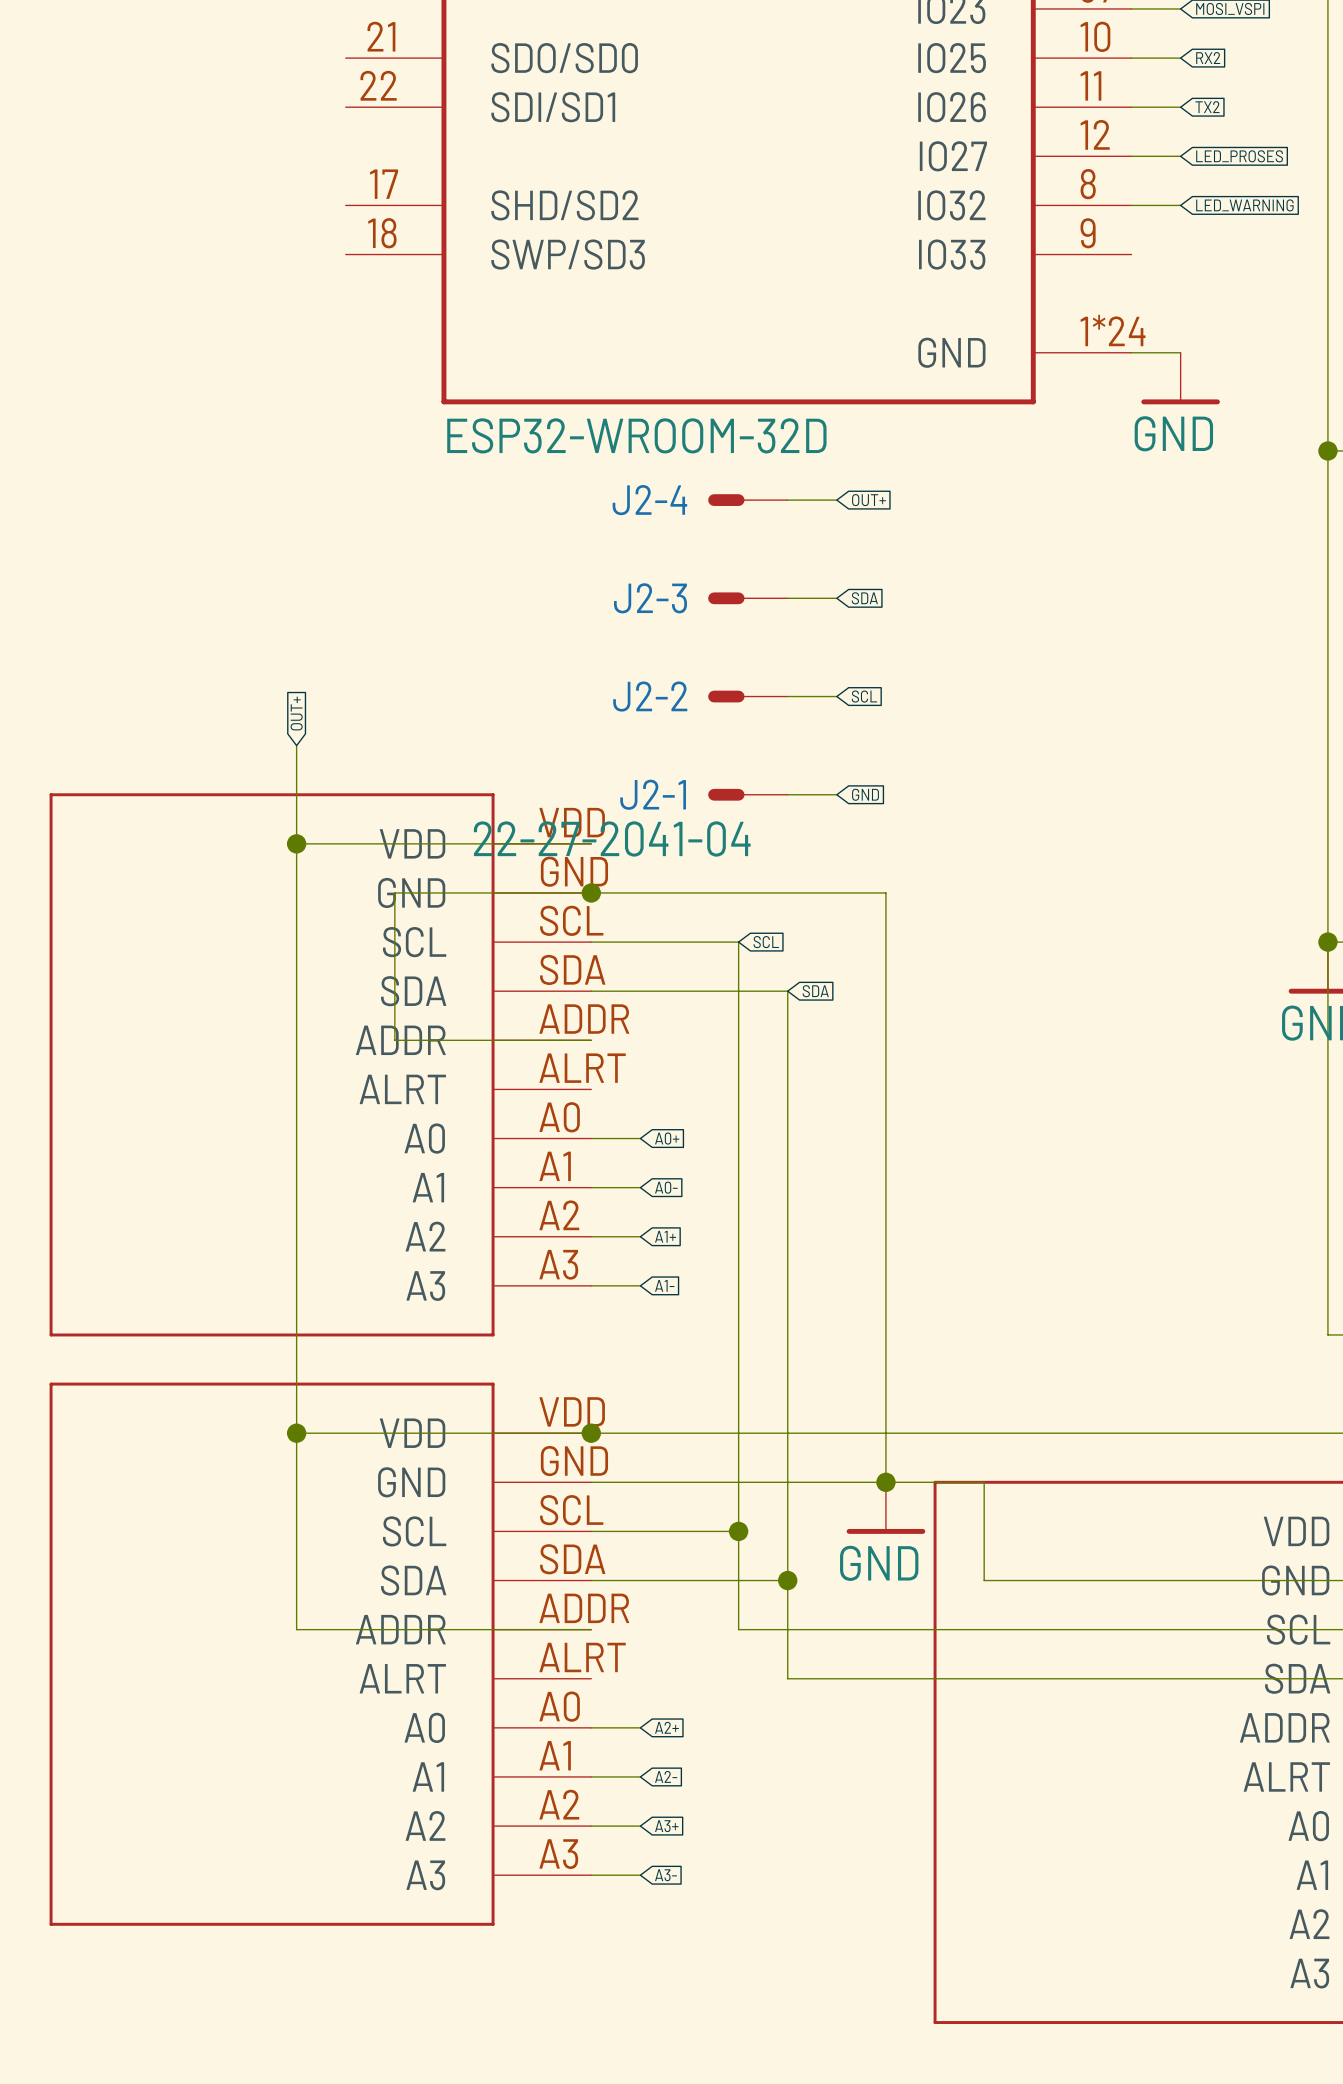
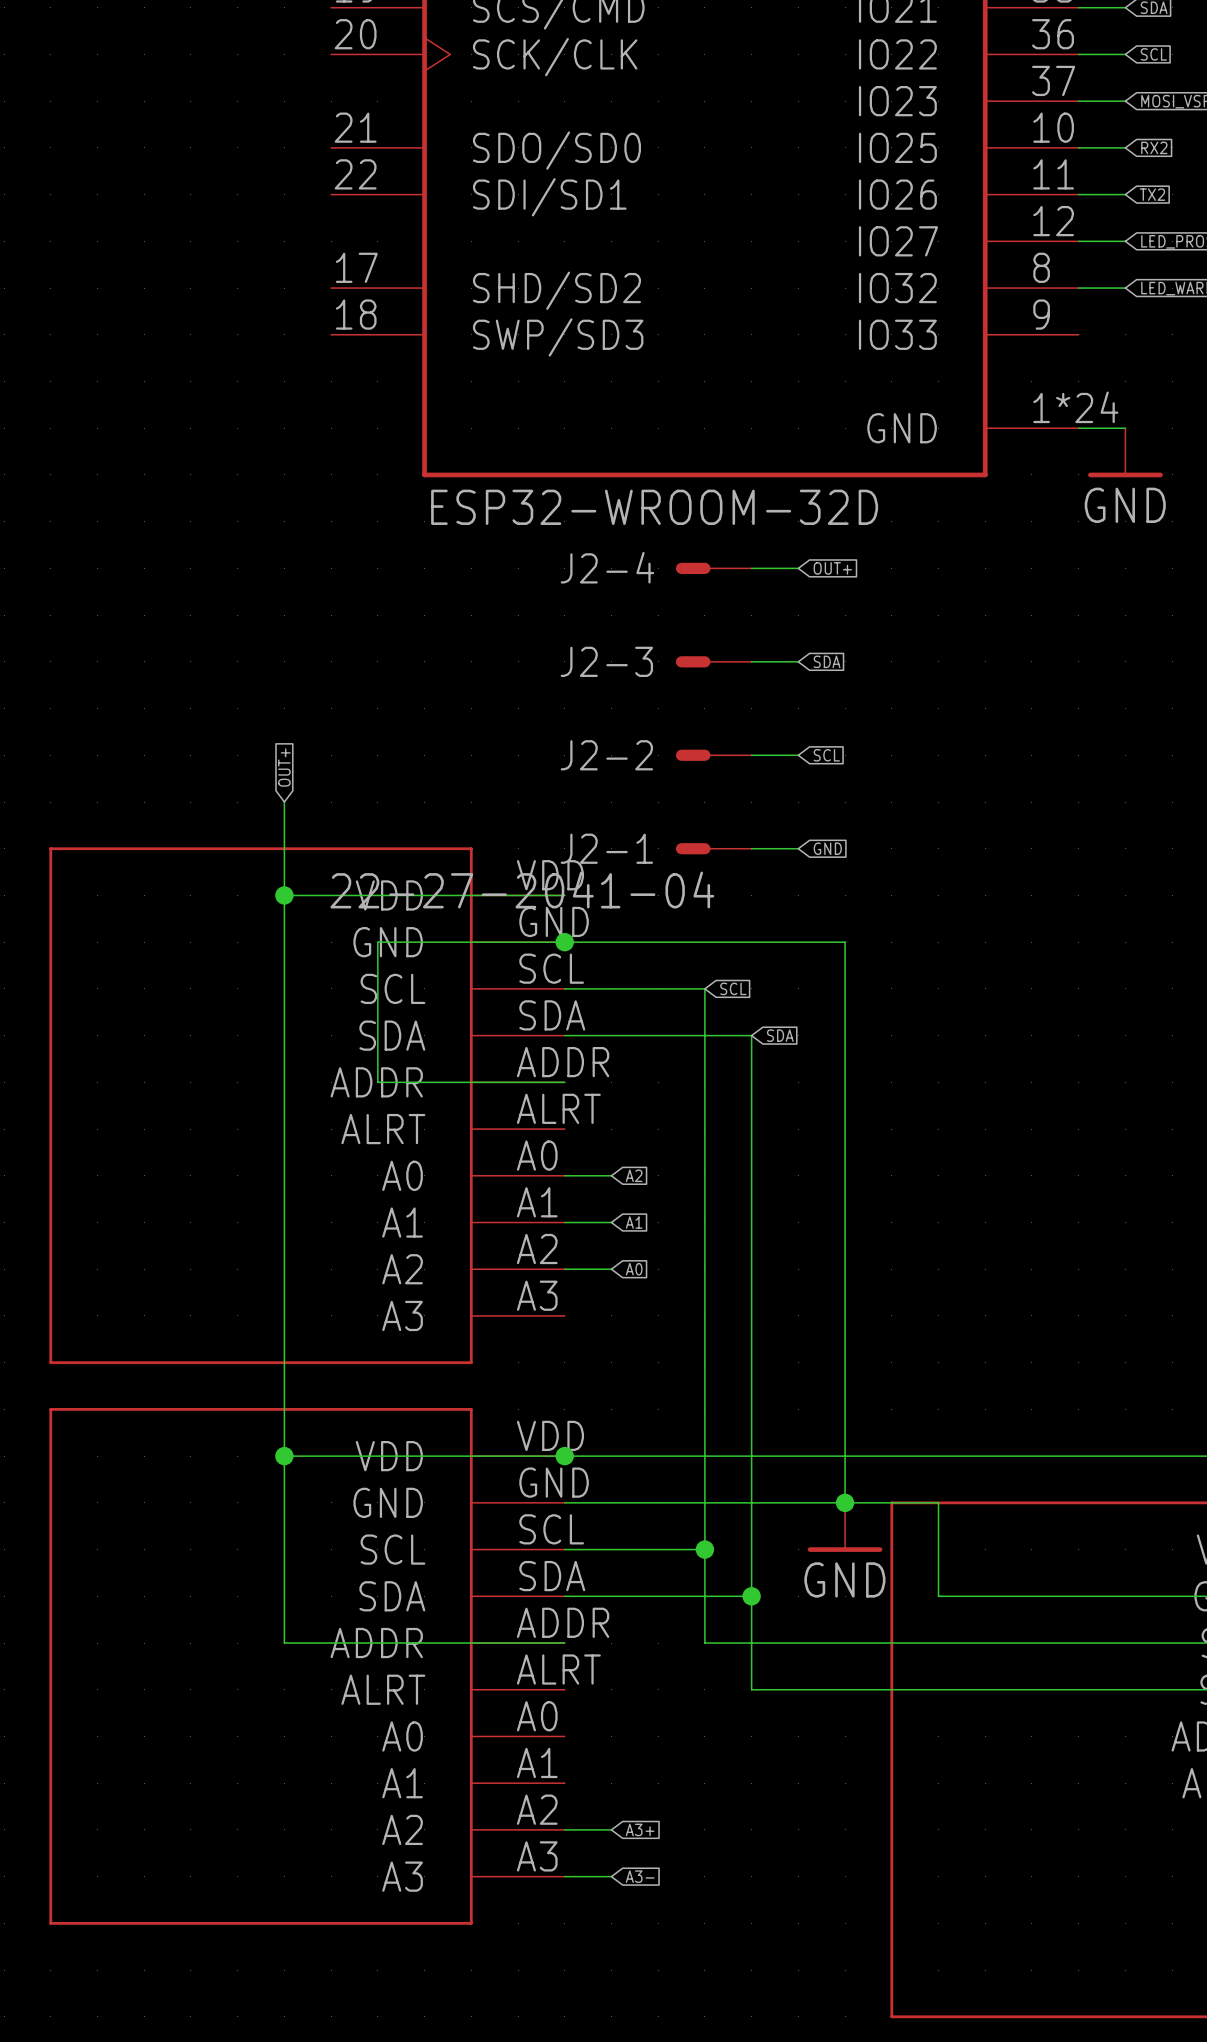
global label: A0+ (667, 1138) -> A2 (634, 1175)
global label: A0- (666, 1187) -> A1 (634, 1222)
global label: A1+ (665, 1236) -> A0 (634, 1269)
wire: (591, 1285) (640, 1285) -> none
global label: A1- (664, 1285) -> none
wire: (591, 1727) (640, 1727) -> none
global label: A2+ (666, 1727) -> none
wire: (591, 1776) (640, 1776) -> none
global label: A2- (666, 1776) -> none

